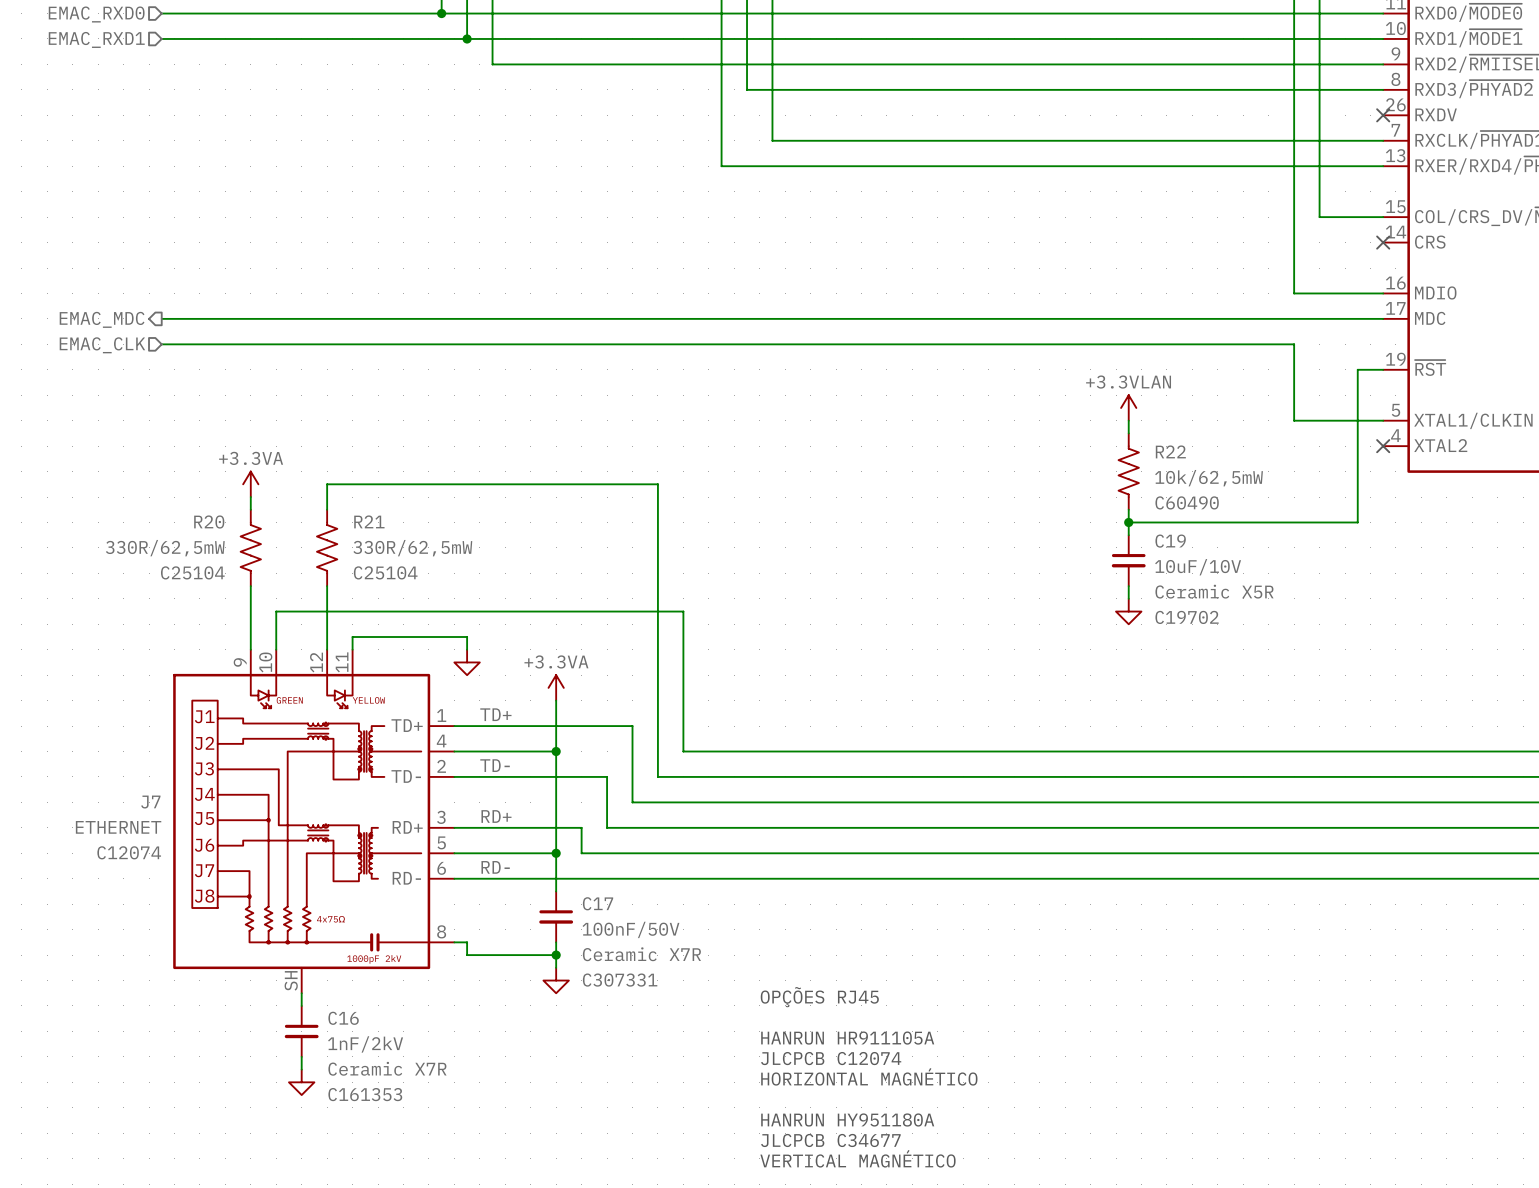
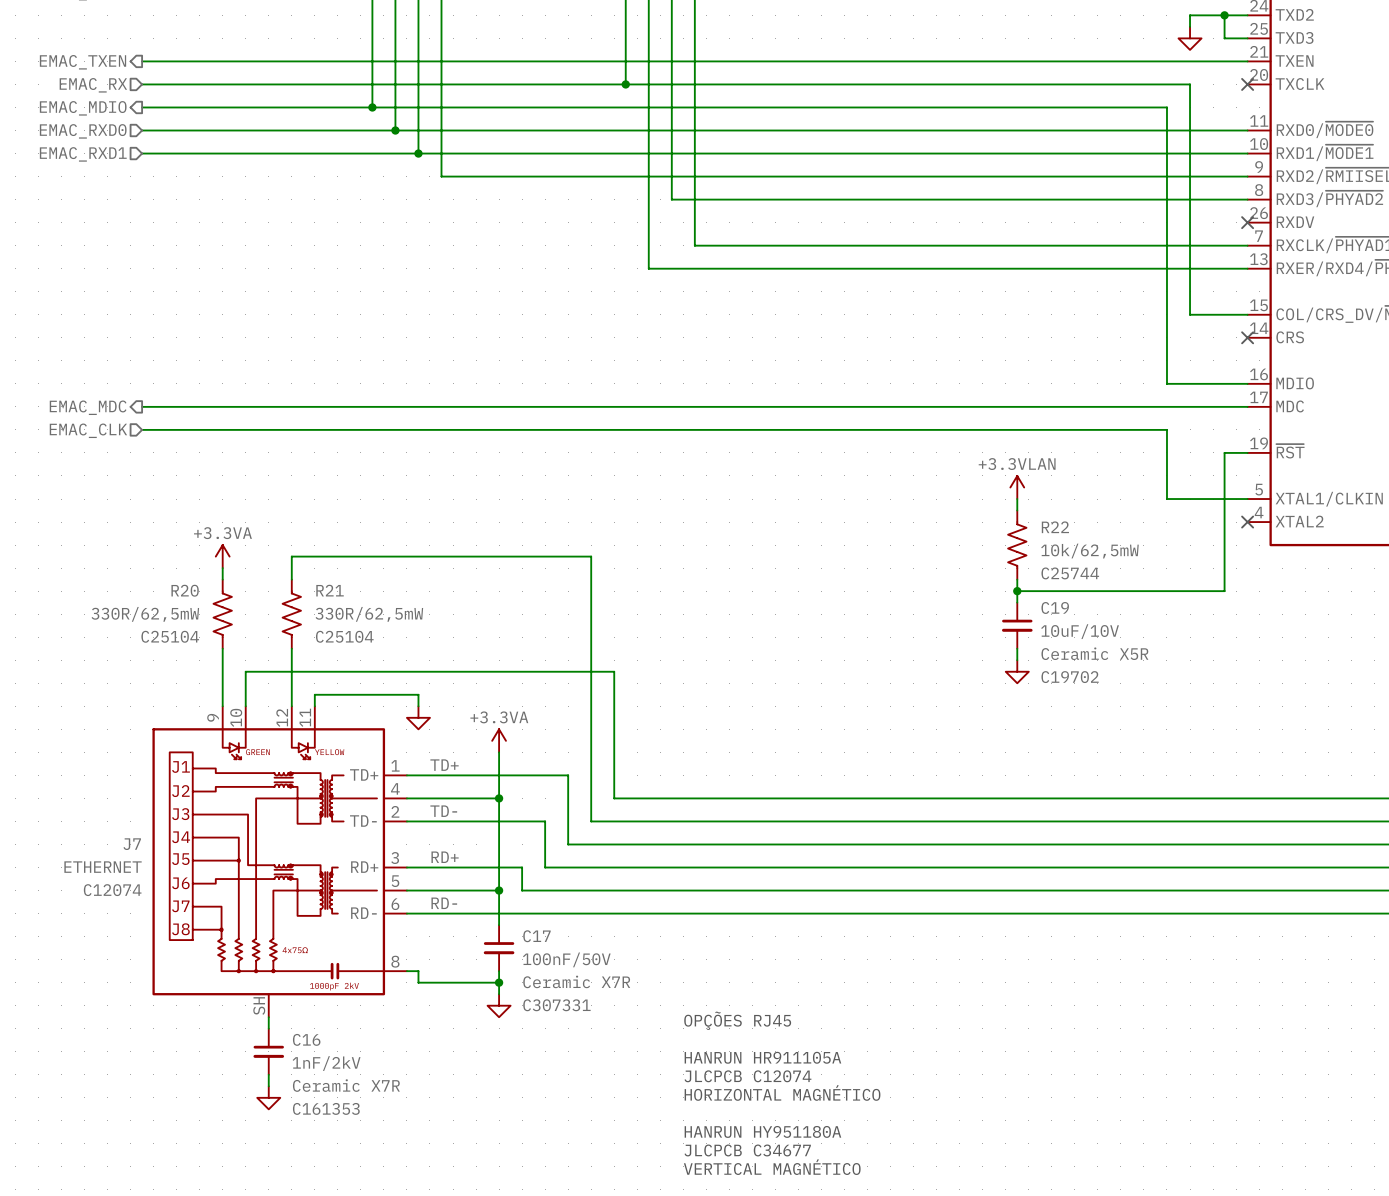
R22 text: C60490 (1187, 502) -> C25744 (1070, 573)

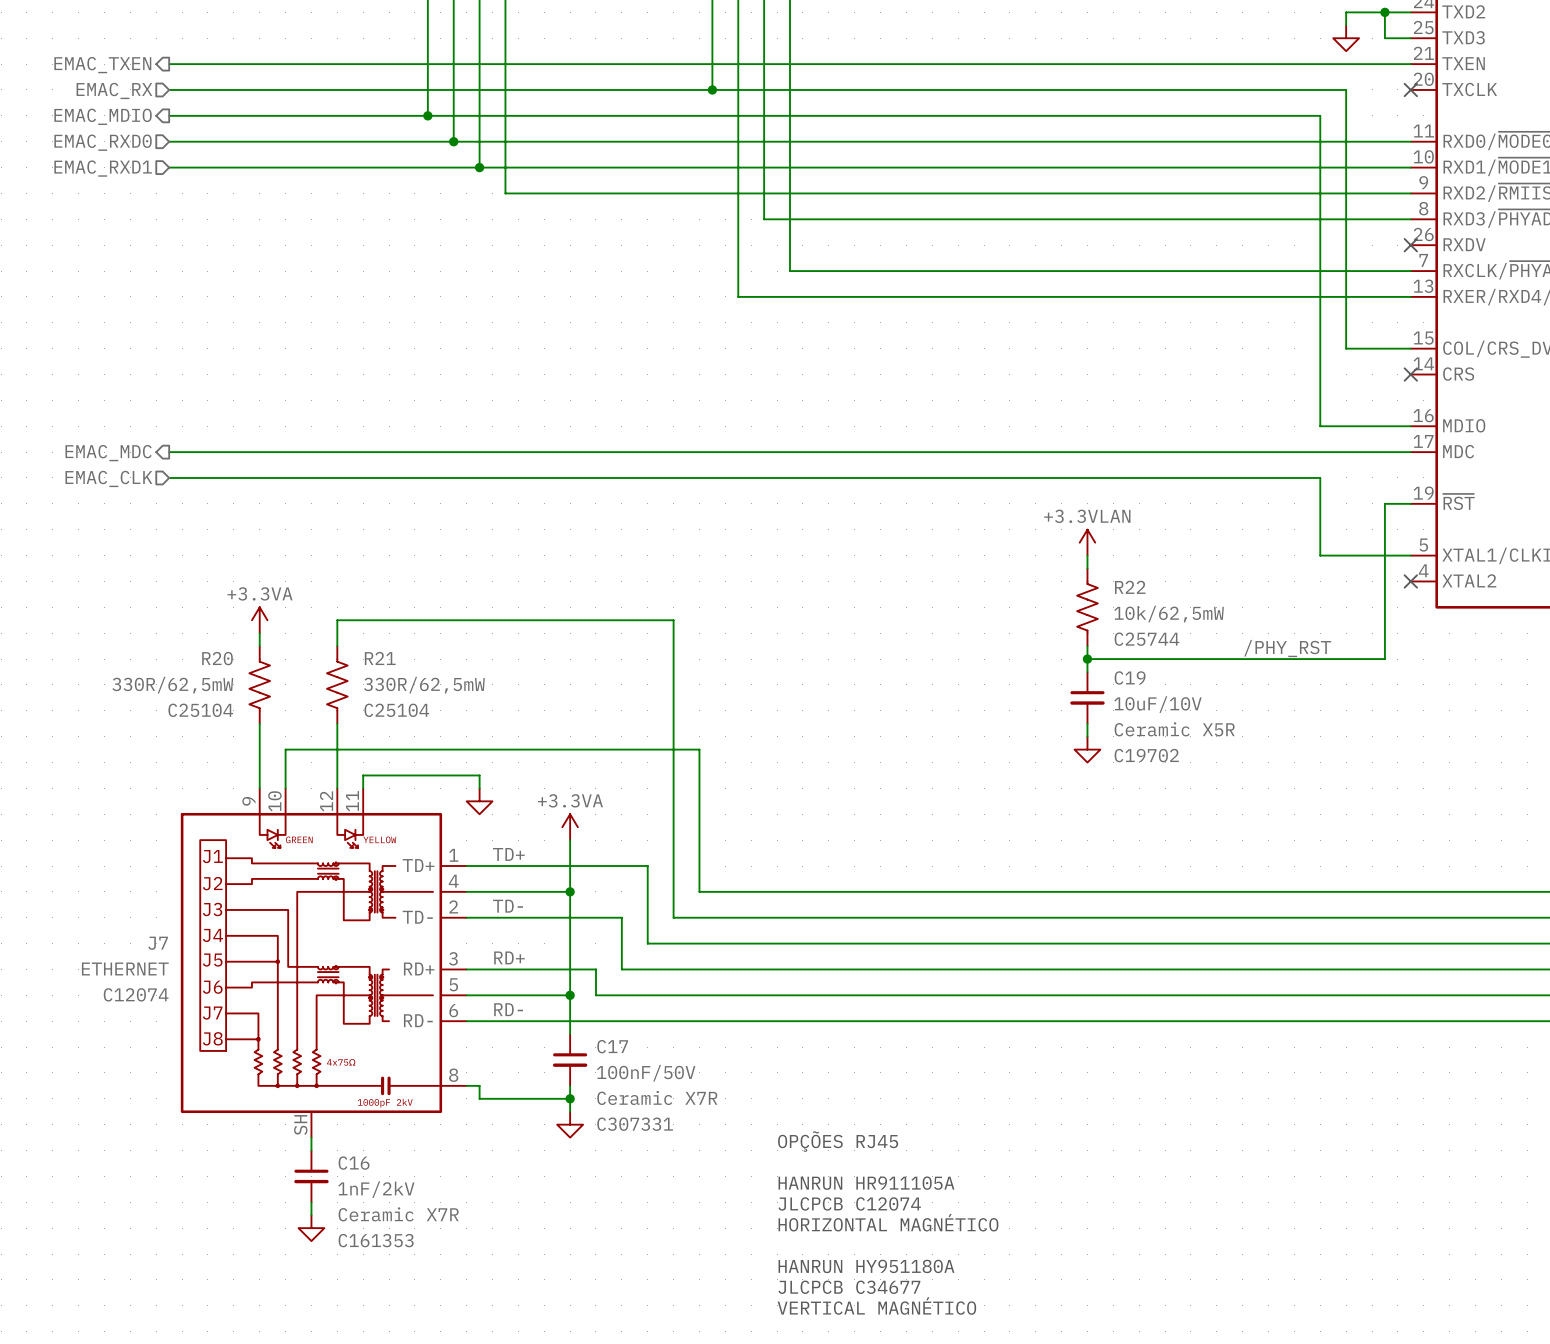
power symbol position: +3.3VLAN (1017, 487) -> +3.3VLAN (1087, 542)
wire: (1017, 499) (1017, 510) -> (1087, 555) (1087, 568)
R22 position: (1017, 545) -> (1087, 607)
wire: (1017, 579) (1017, 602) -> (1087, 646) (1087, 671)
label: none -> /PHY_RST (1287, 648)
wire: none -> (1087, 659) (1152, 659)
junction: none -> (1087, 659)
junction: (1017, 591) -> none
C19 position: (1017, 625) -> (1087, 697)
wire: (1017, 648) (1017, 660) -> (1087, 723) (1087, 736)
power symbol position: (1017, 671) -> (1087, 749)

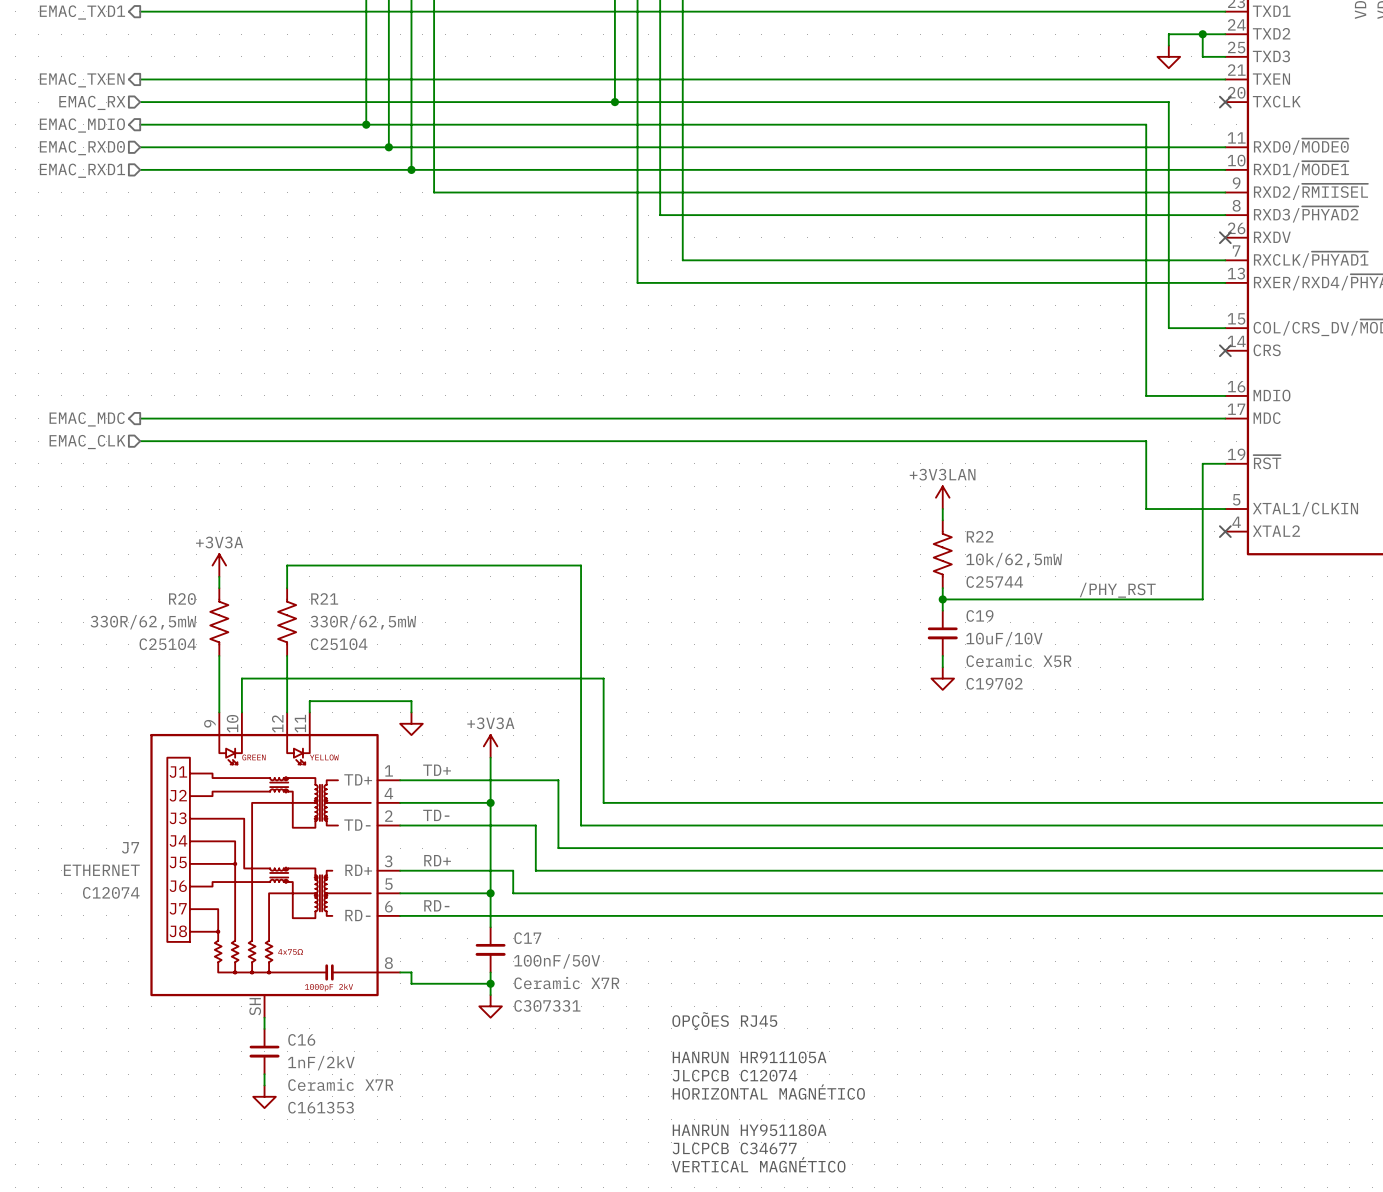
power symbol: +3.3VLAN (1087, 542) -> +3V3LAN (942, 497)
power symbol: +3.3VA (259, 620) -> +3V3A (219, 565)
power symbol: +3.3VA (570, 827) -> +3V3A (490, 746)

